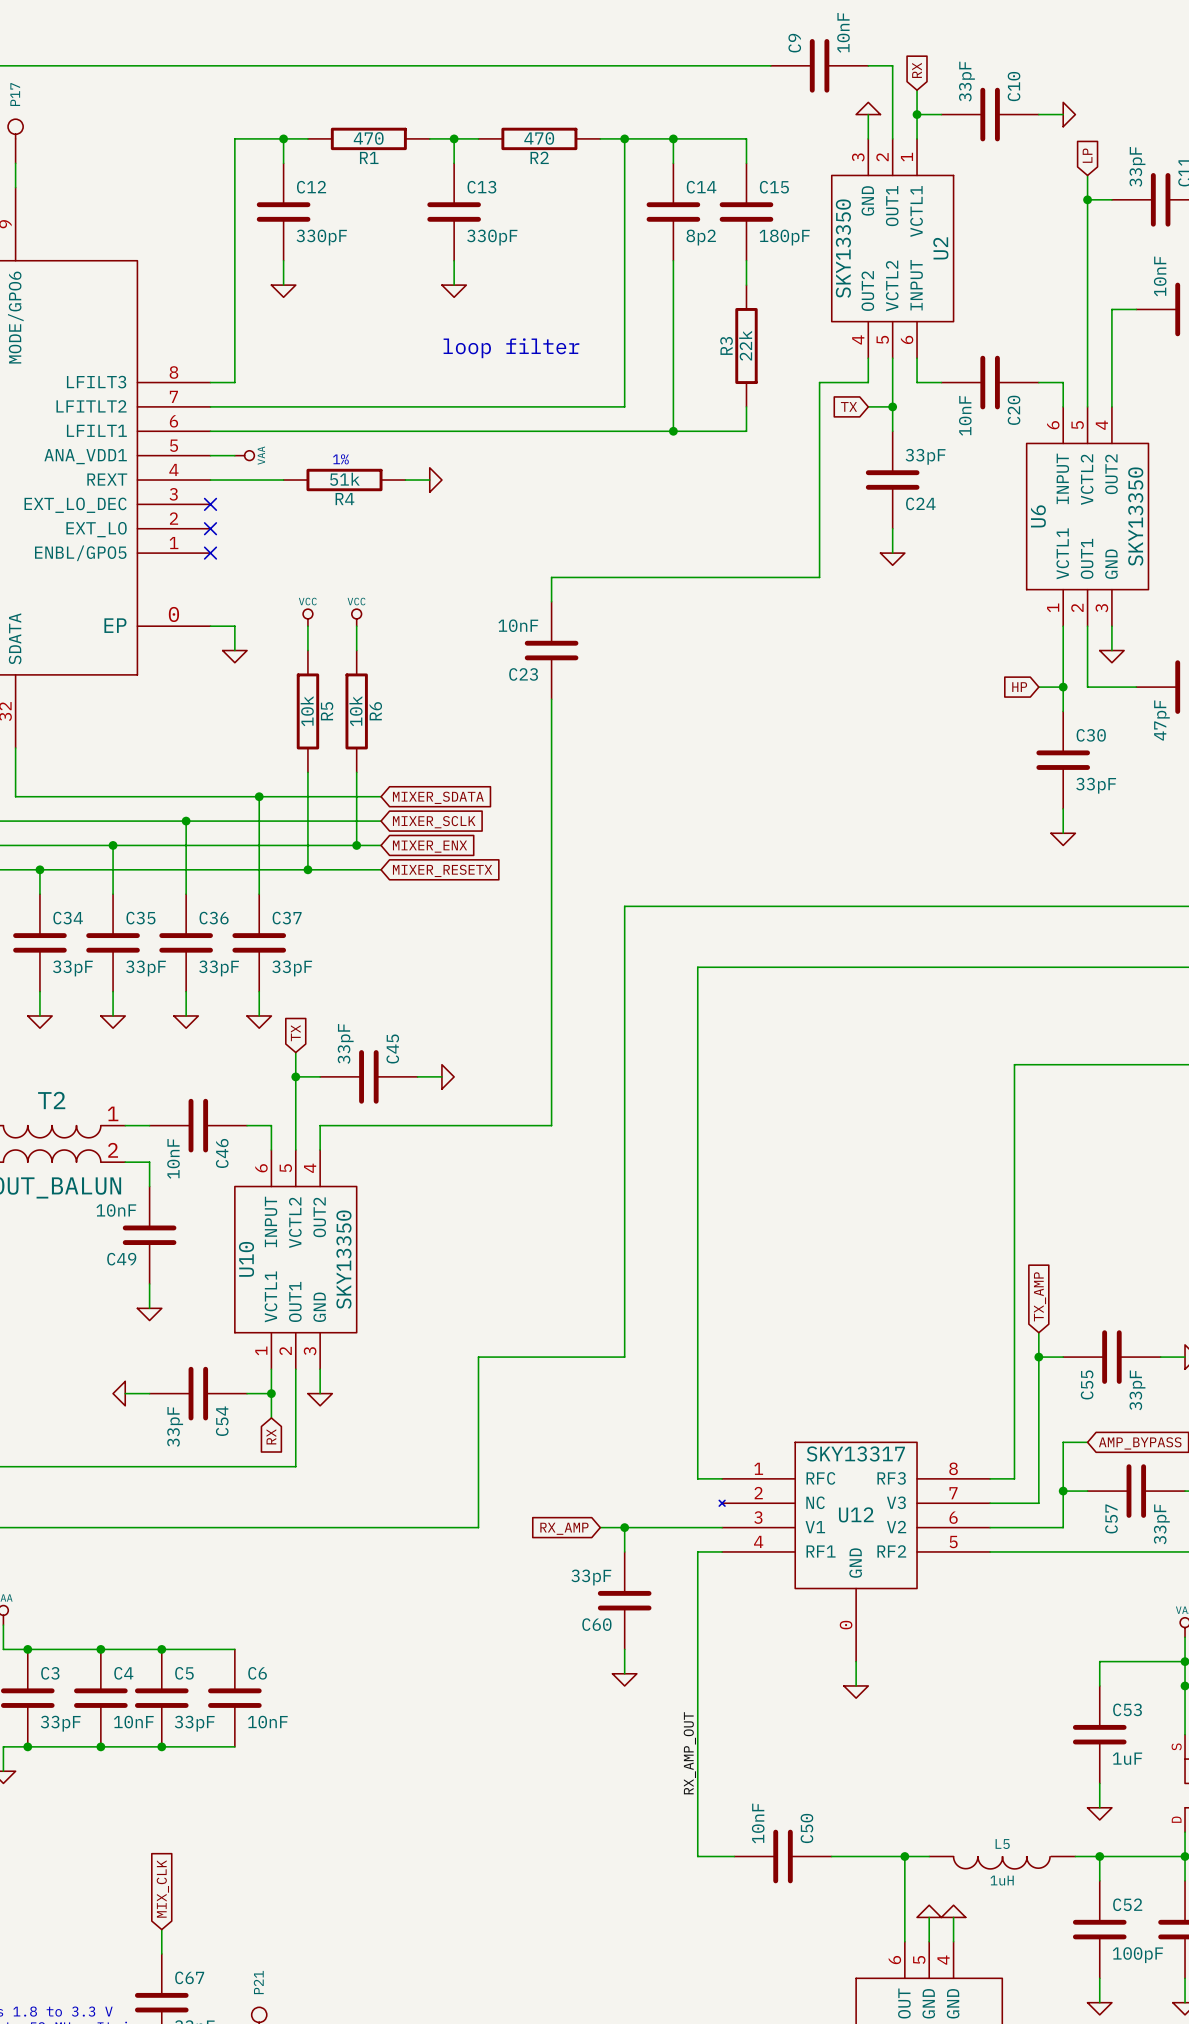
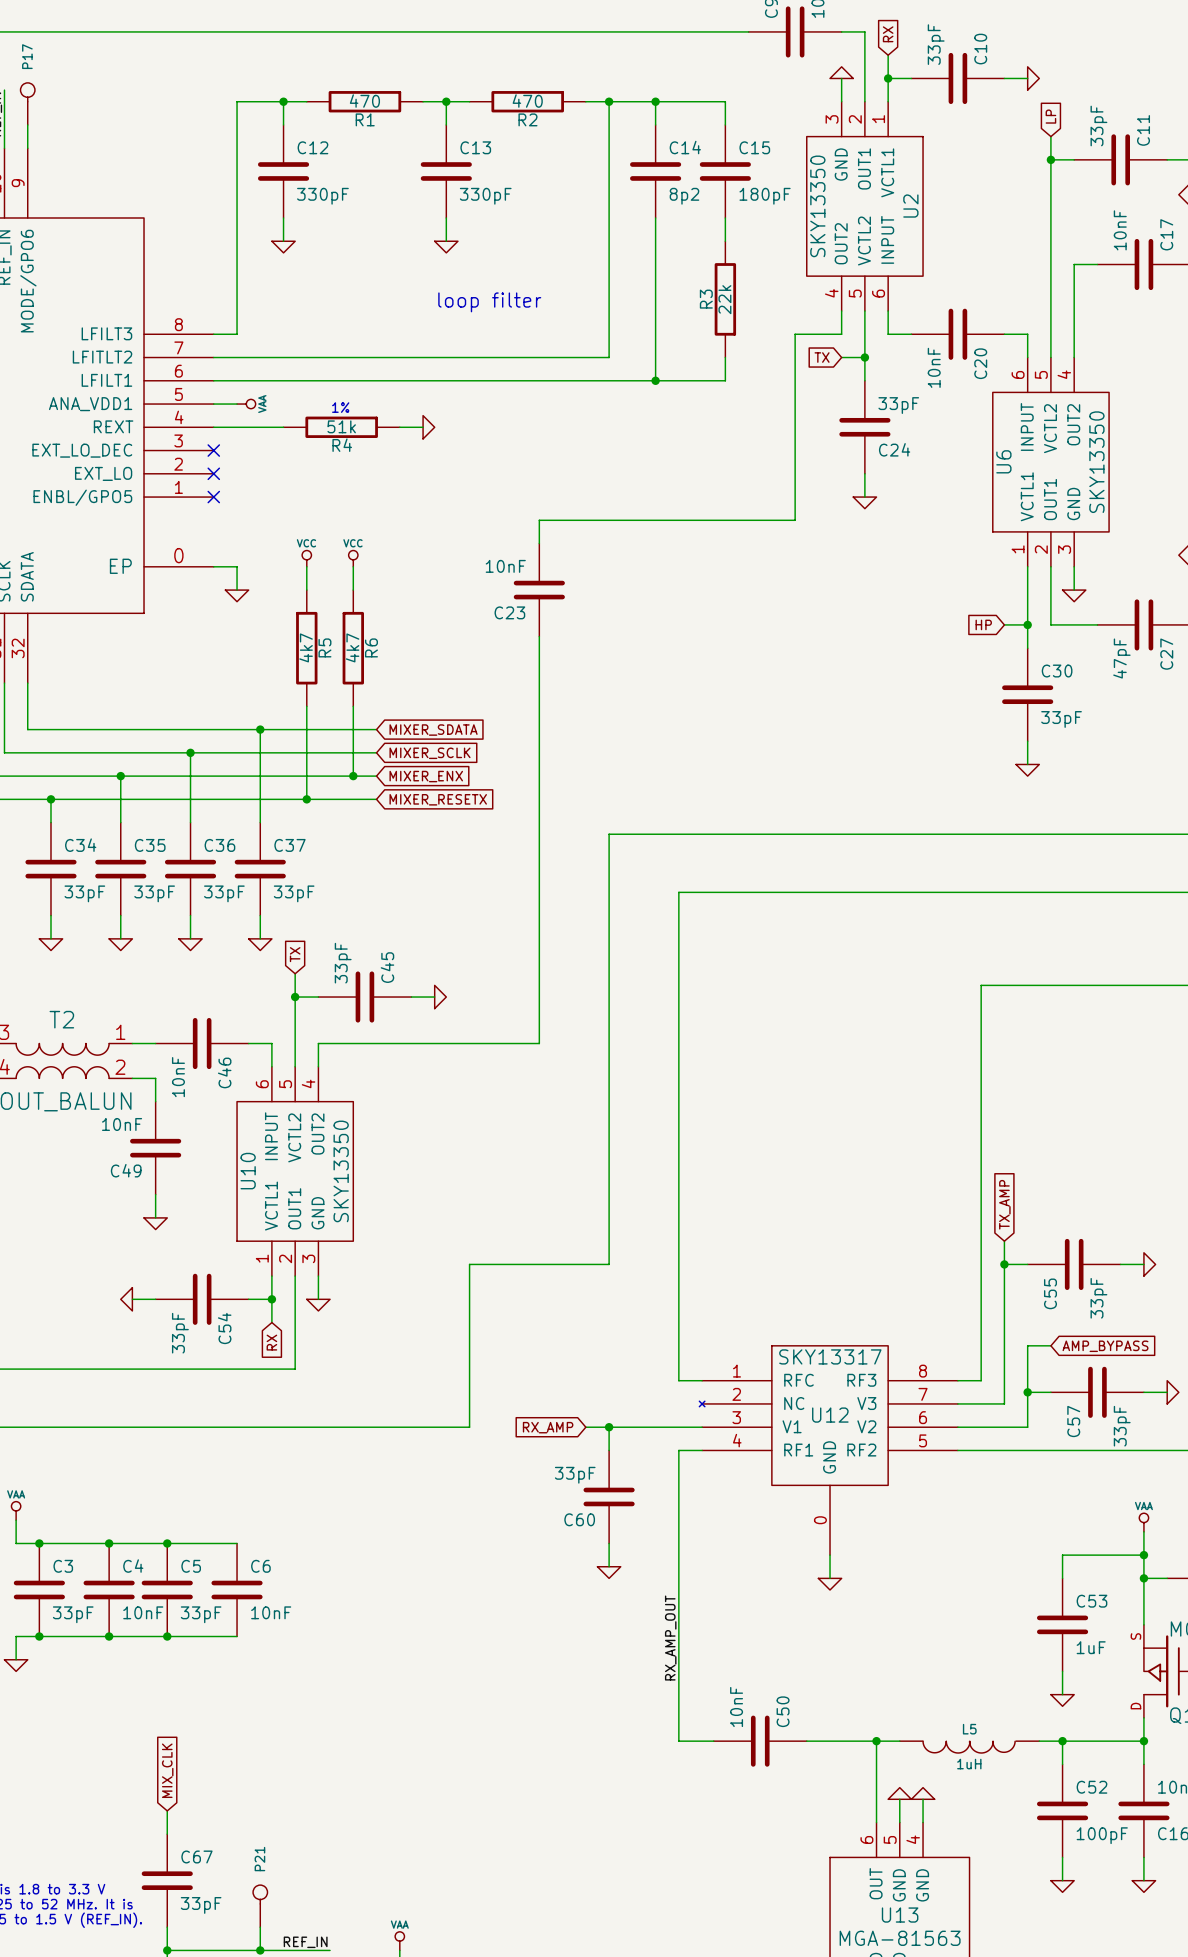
R5 value: 10k (307, 711) -> 4k7 (306, 647)
R6 value: 10k (355, 711) -> 4k7 (352, 647)

